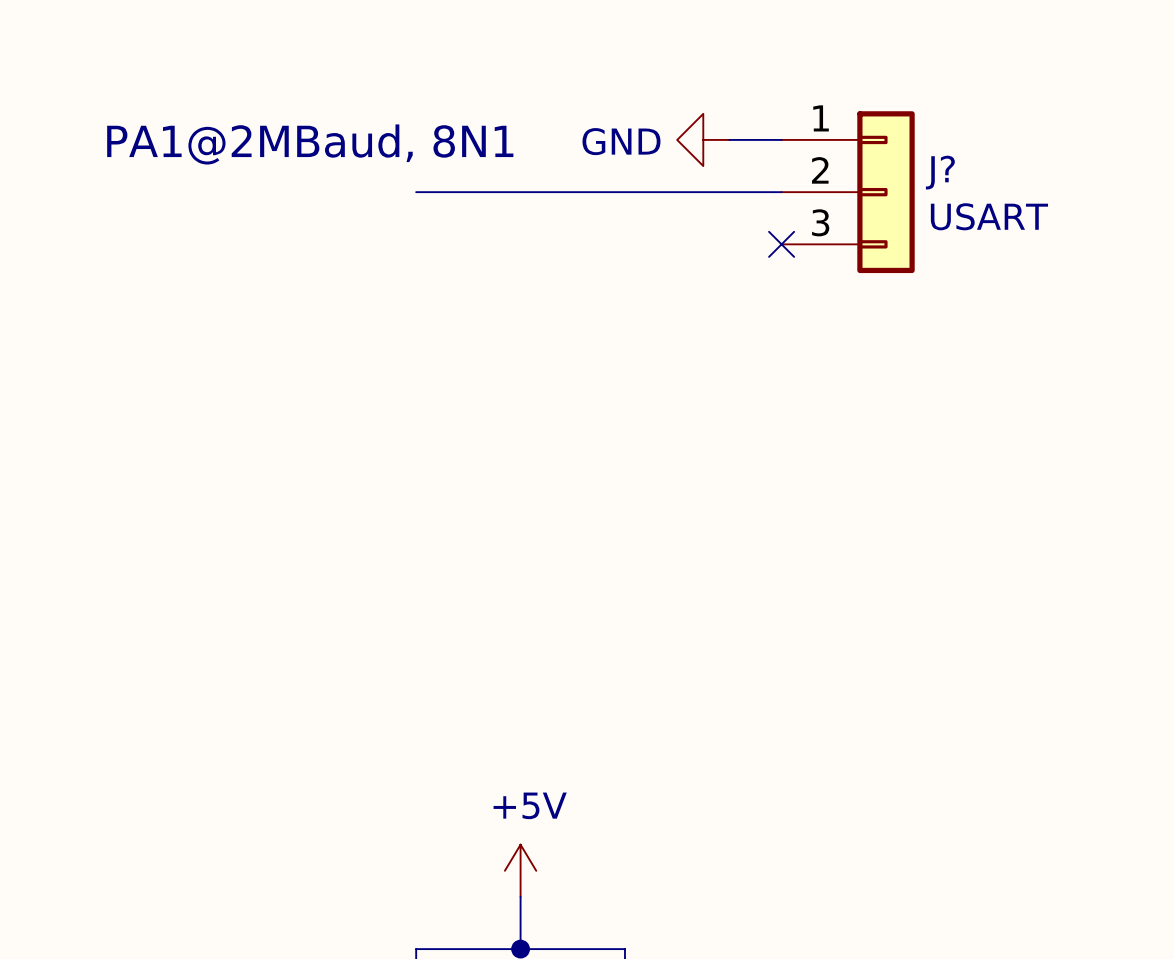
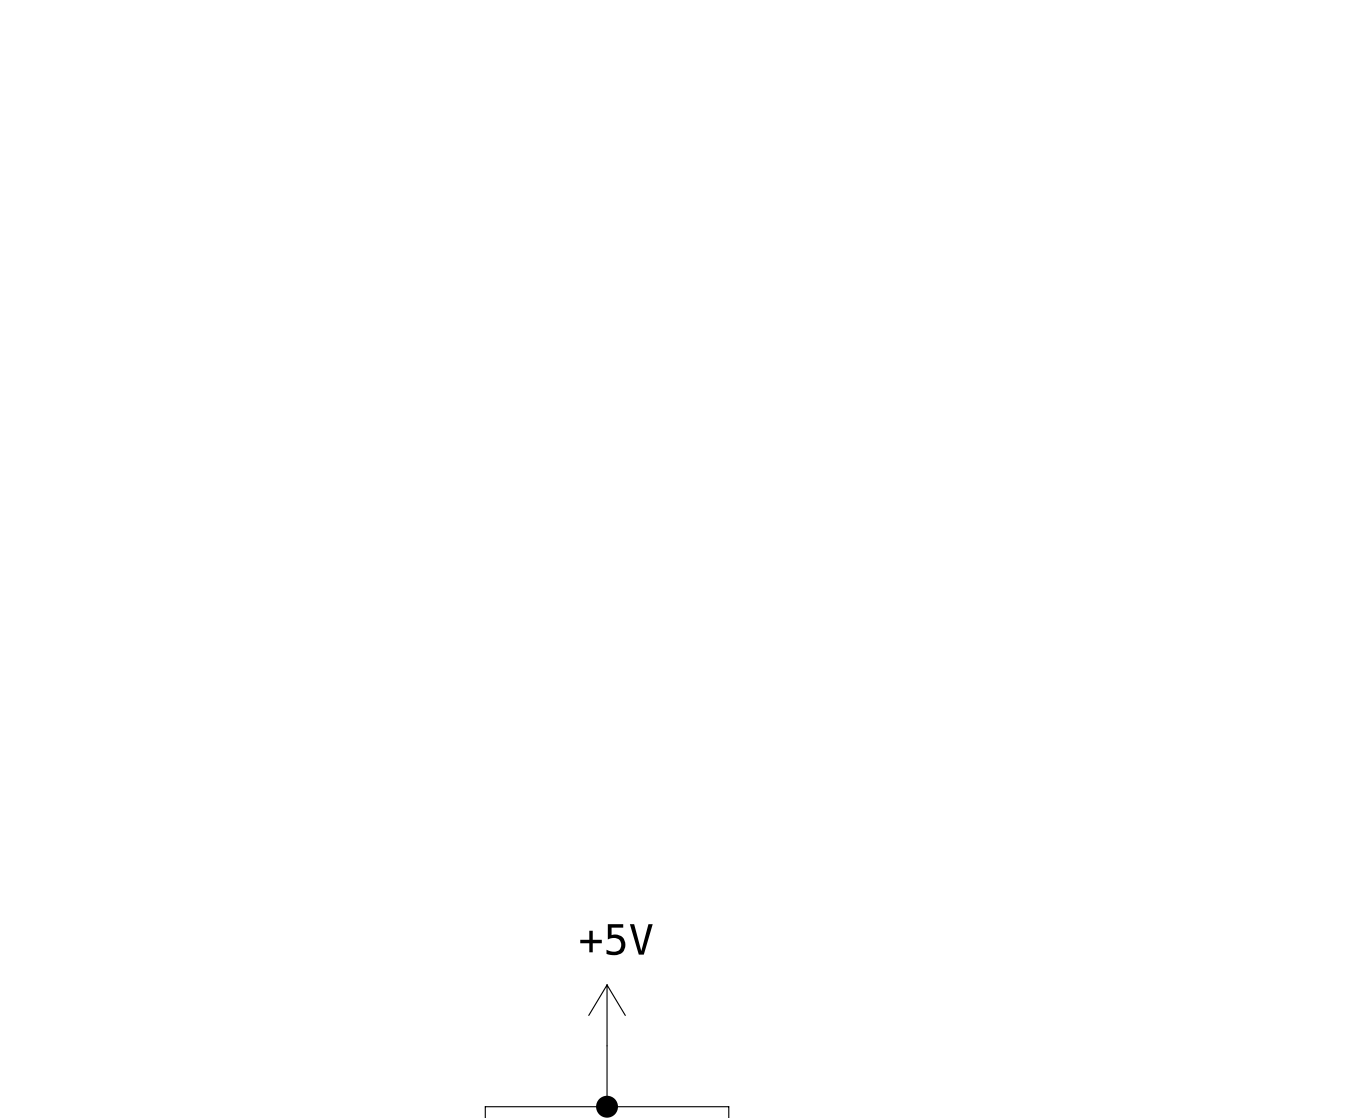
power symbol: GND (703, 139) -> none
wire: (729, 139) (781, 139) -> none
text: PA1@2MBaud, 8N1 (310, 144) -> none
wire: (416, 192) (781, 192) -> none
J?: USART (848, 192) -> none
no-connect mark: (781, 244) -> none

